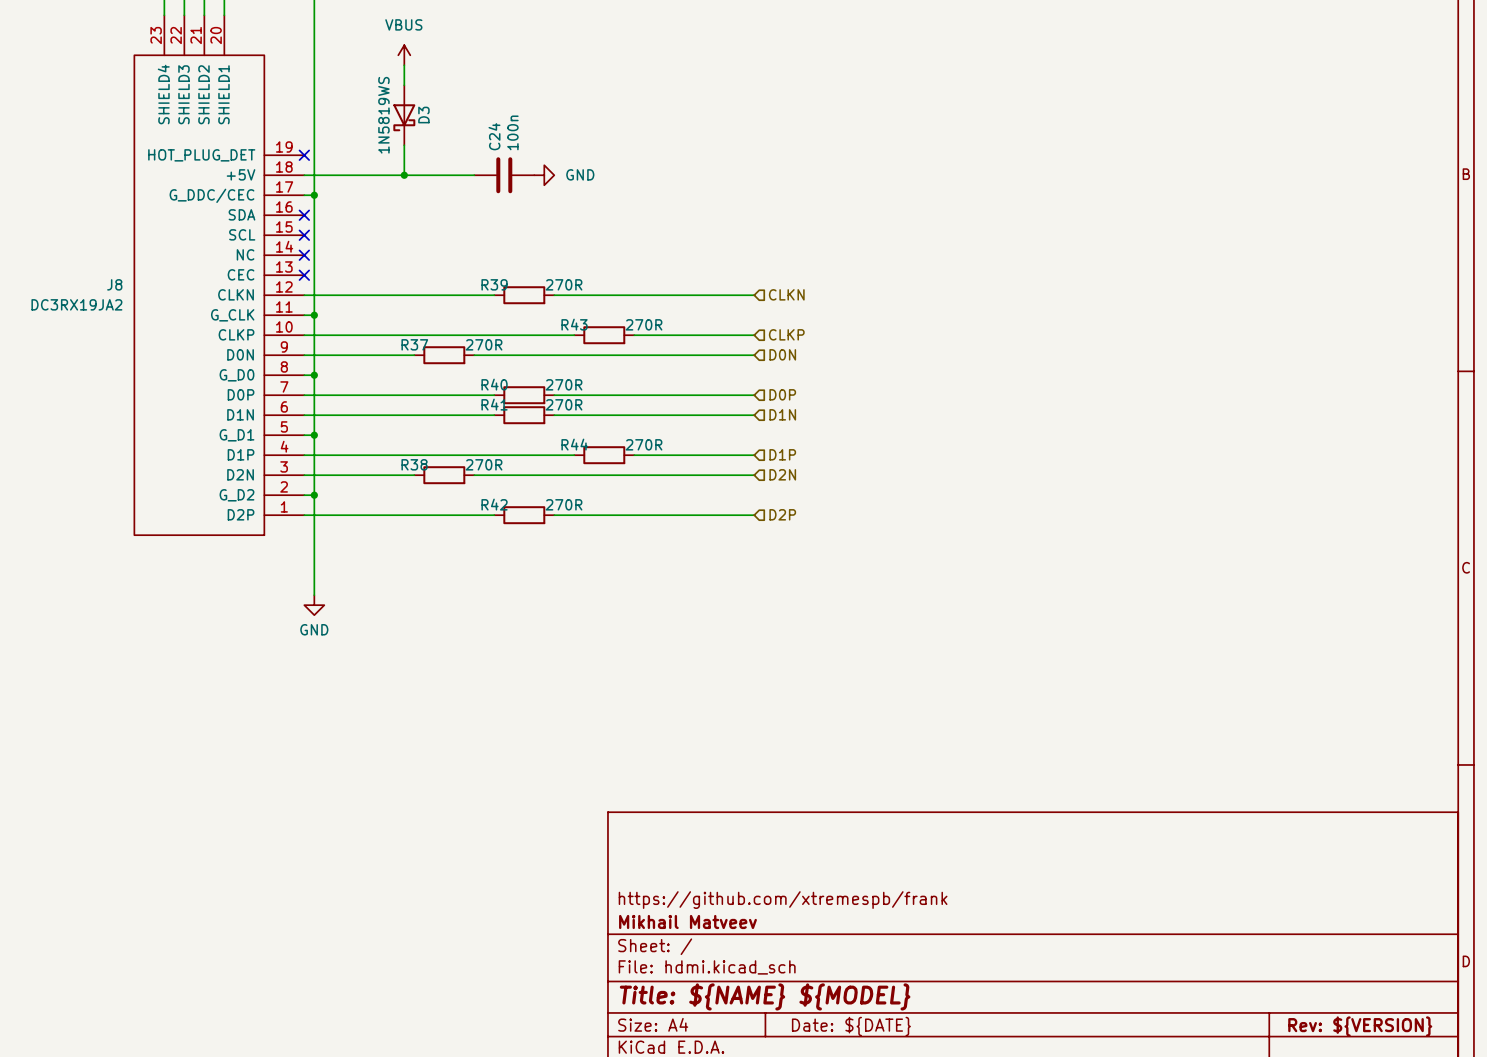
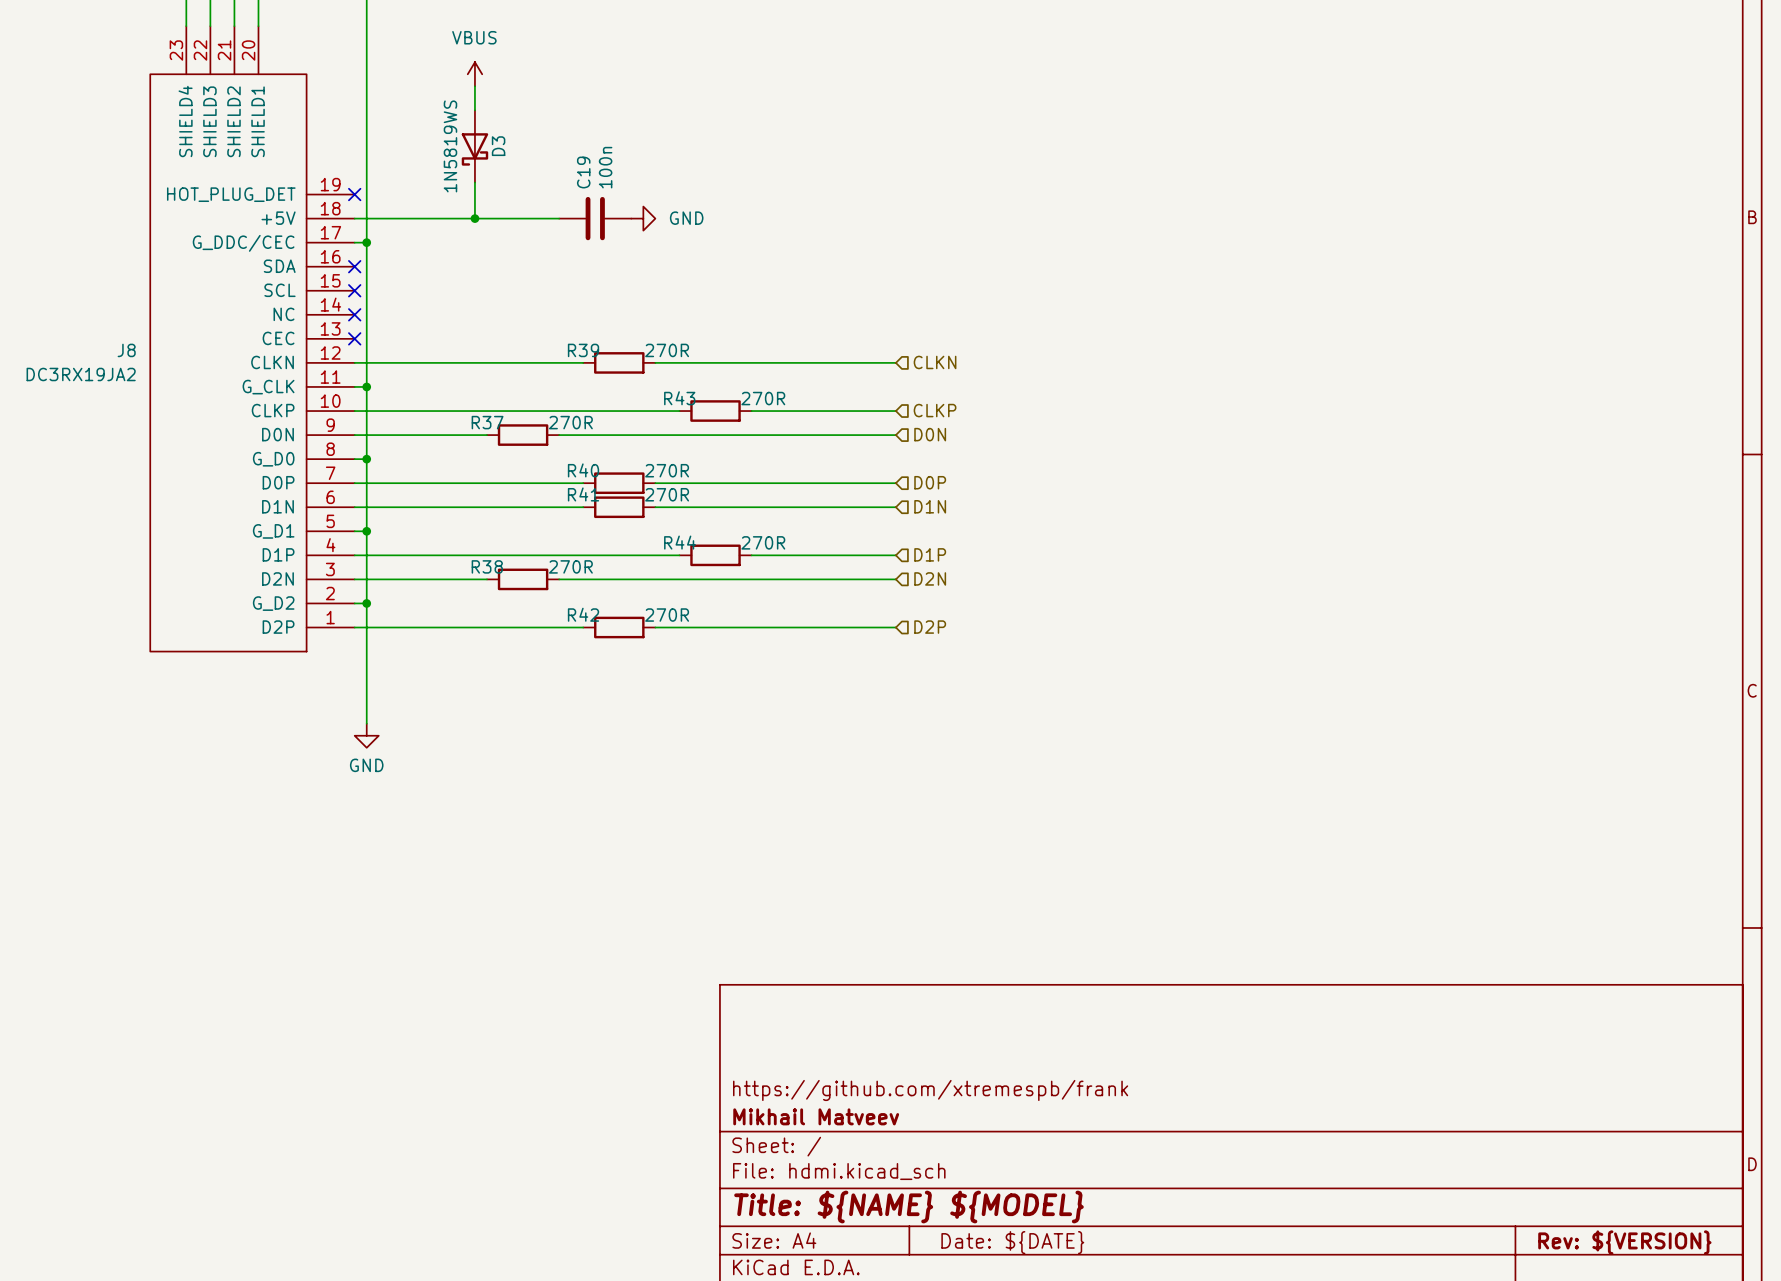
C24 name: C24 (494, 136) -> C19 (583, 172)

